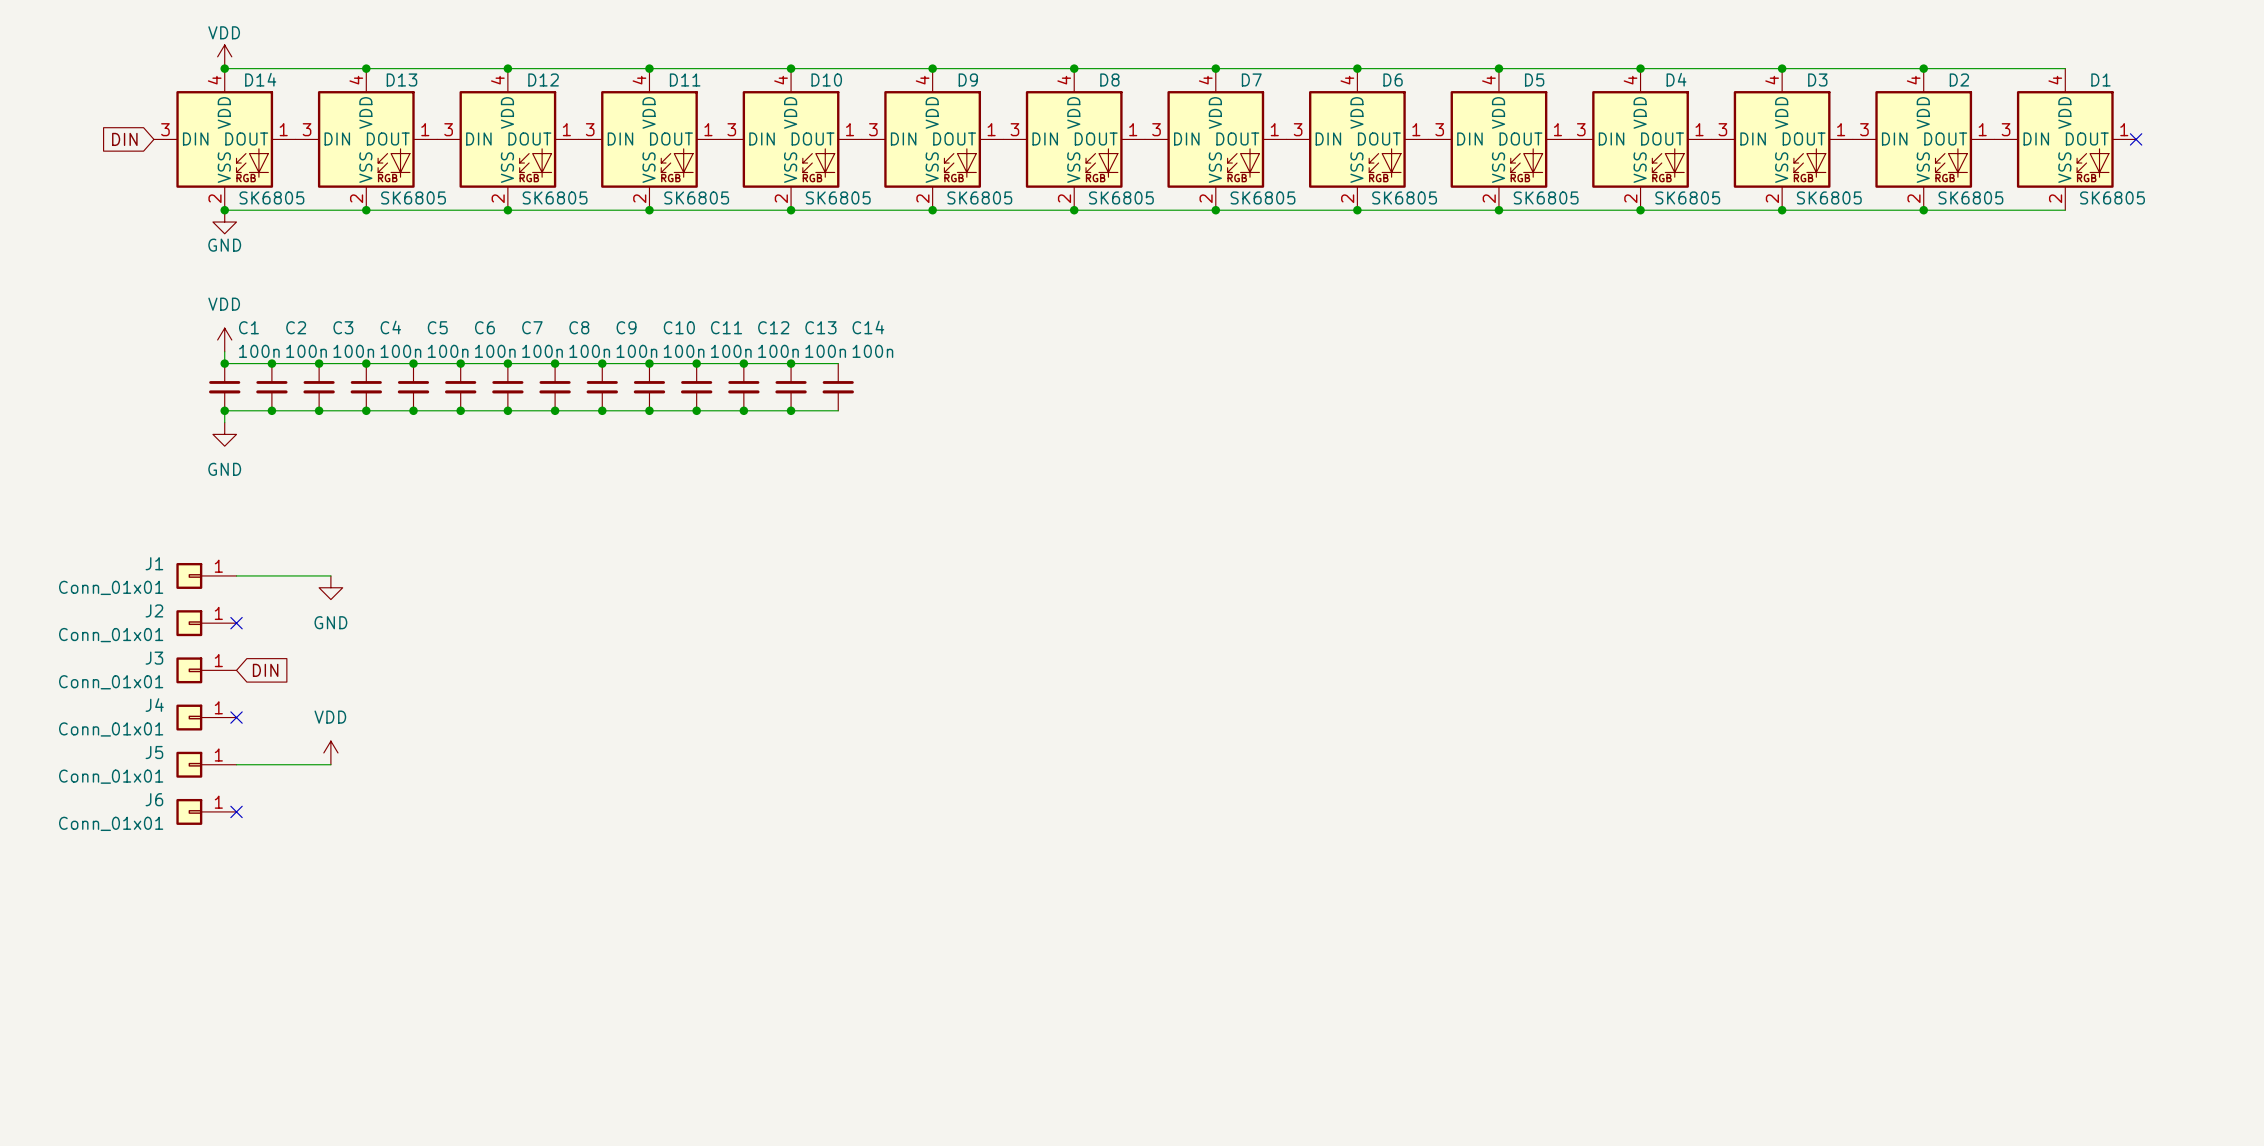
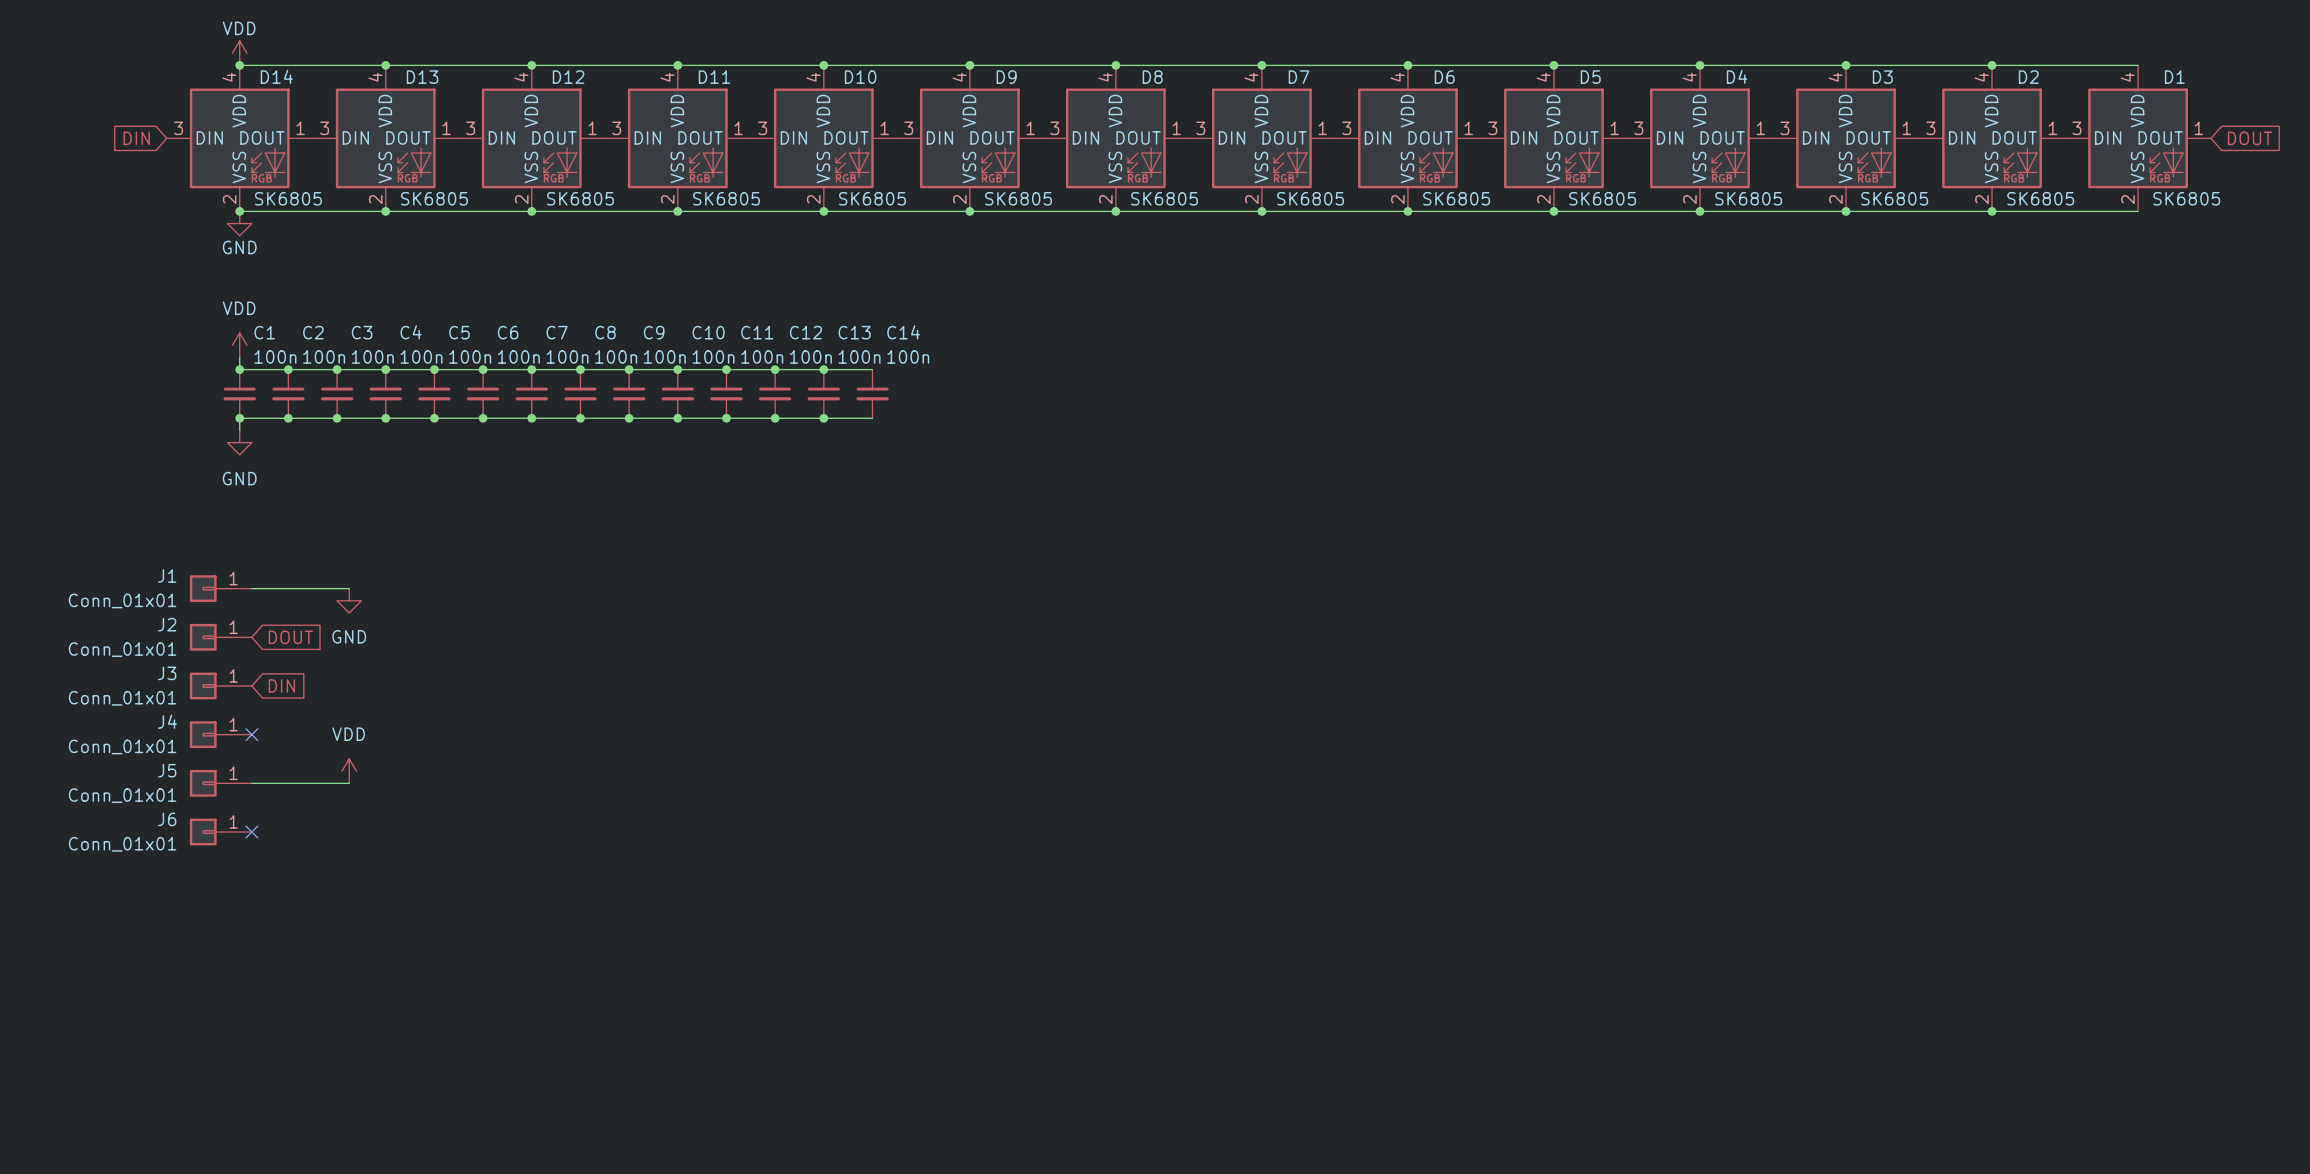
no-connect mark: (2136, 139) -> none
global label: none -> DOUT (2250, 138)
no-connect mark: (236, 623) -> none
global label: none -> DOUT (290, 637)

